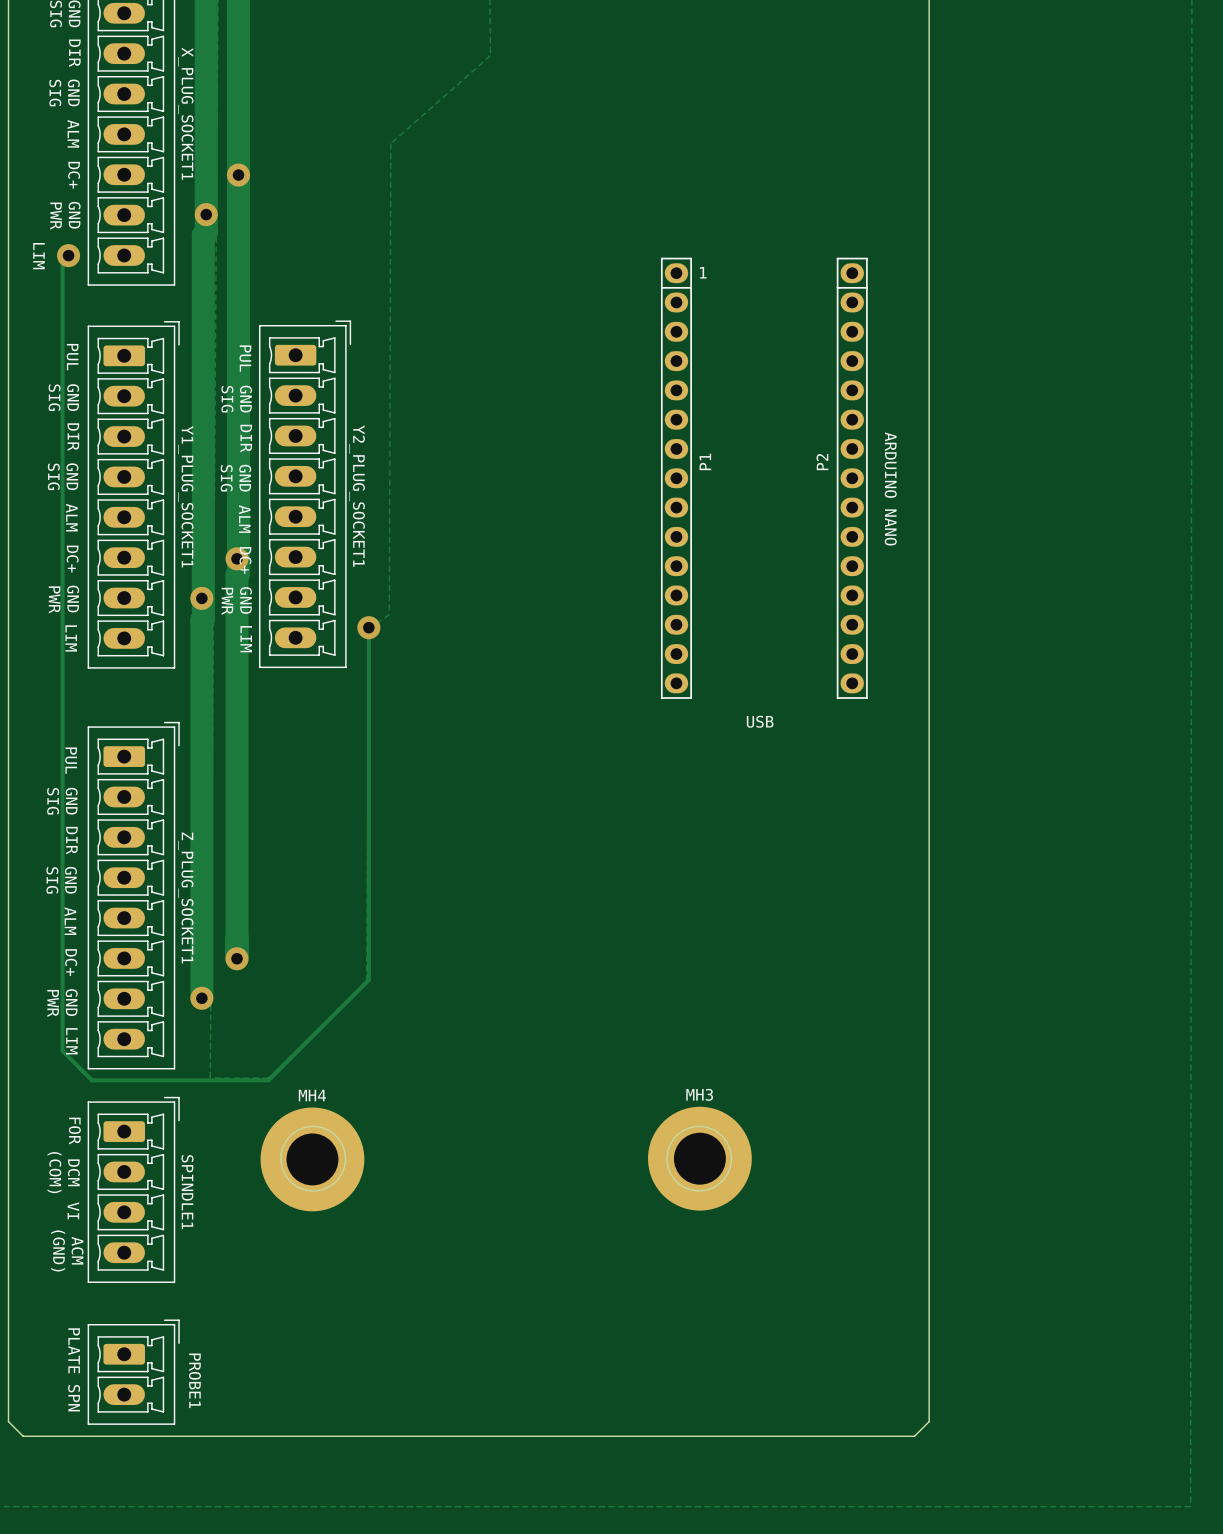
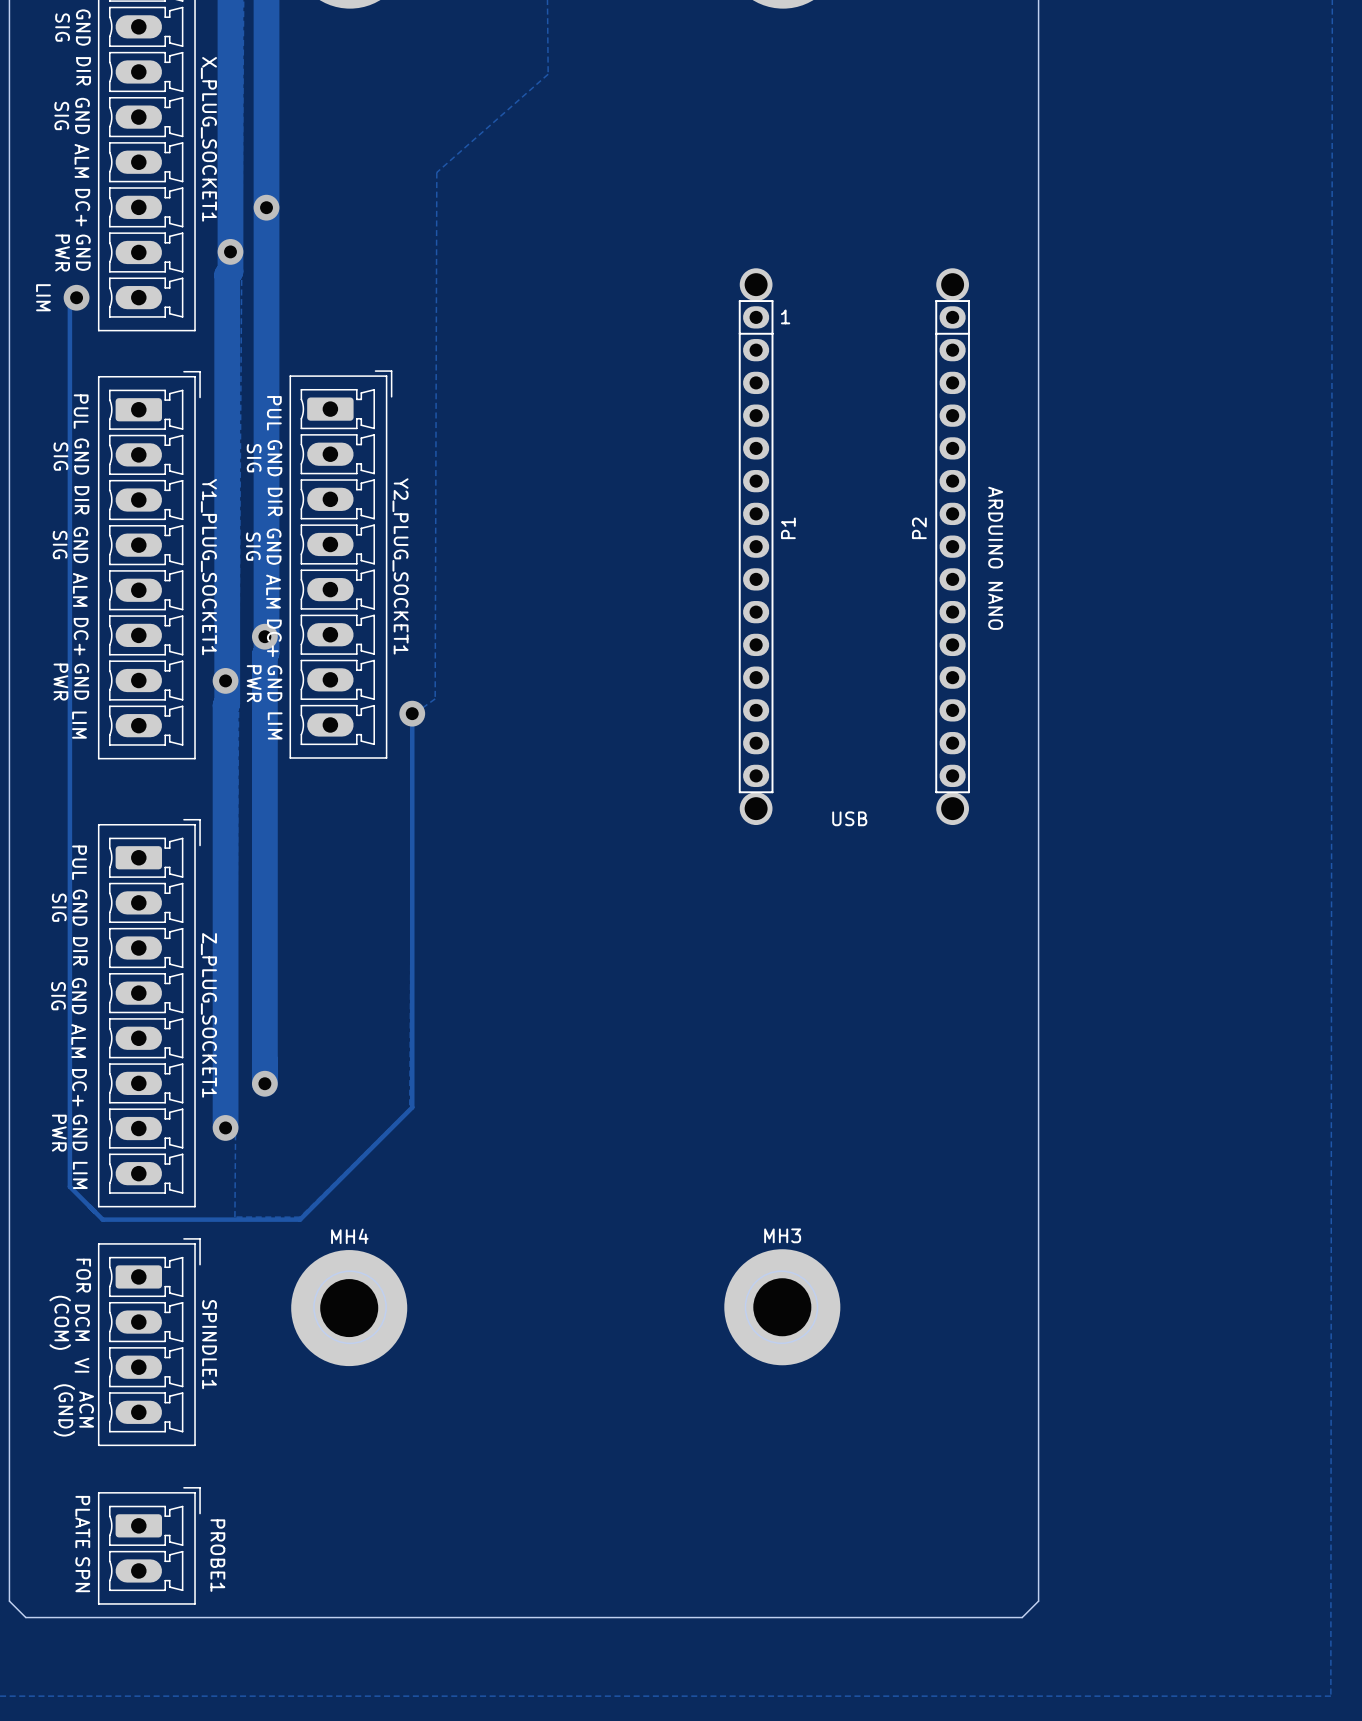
part: none -> (756, 284)
part: none -> (952, 284)
part: none -> (756, 808)
part: none -> (952, 808)

